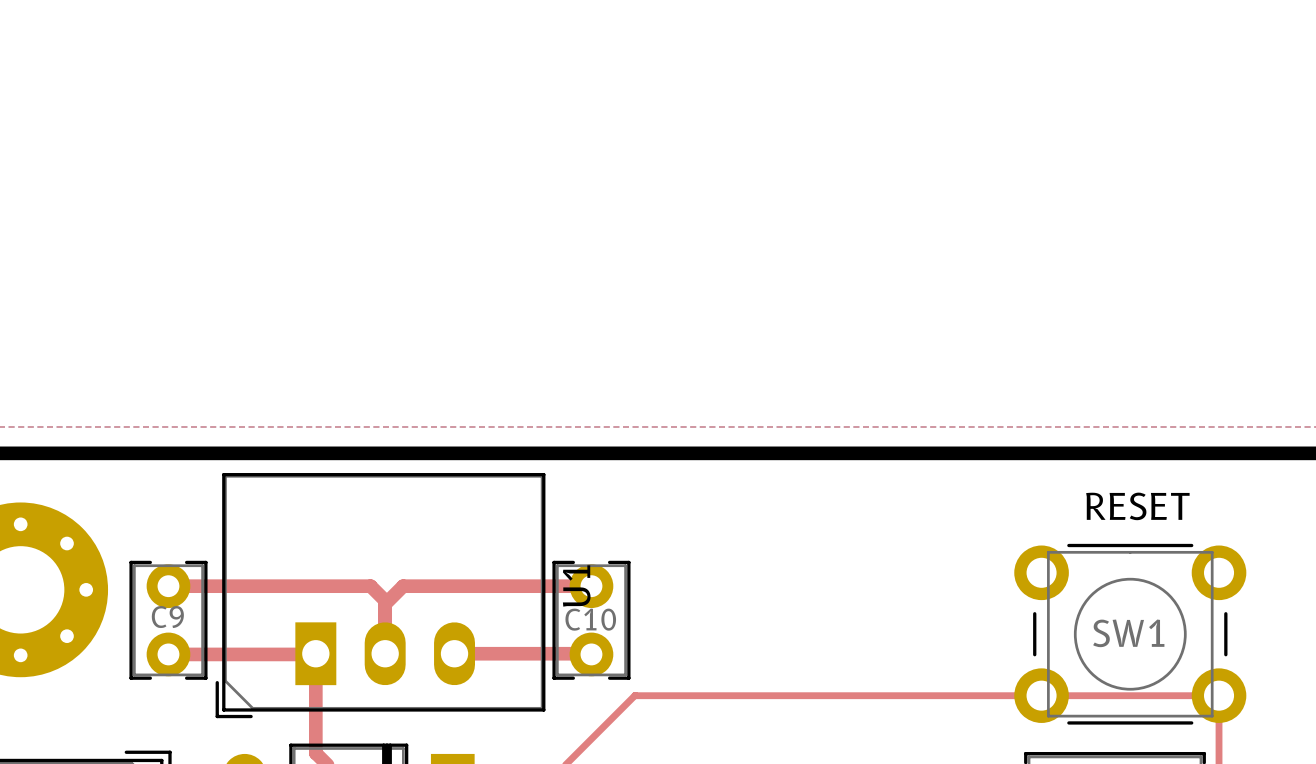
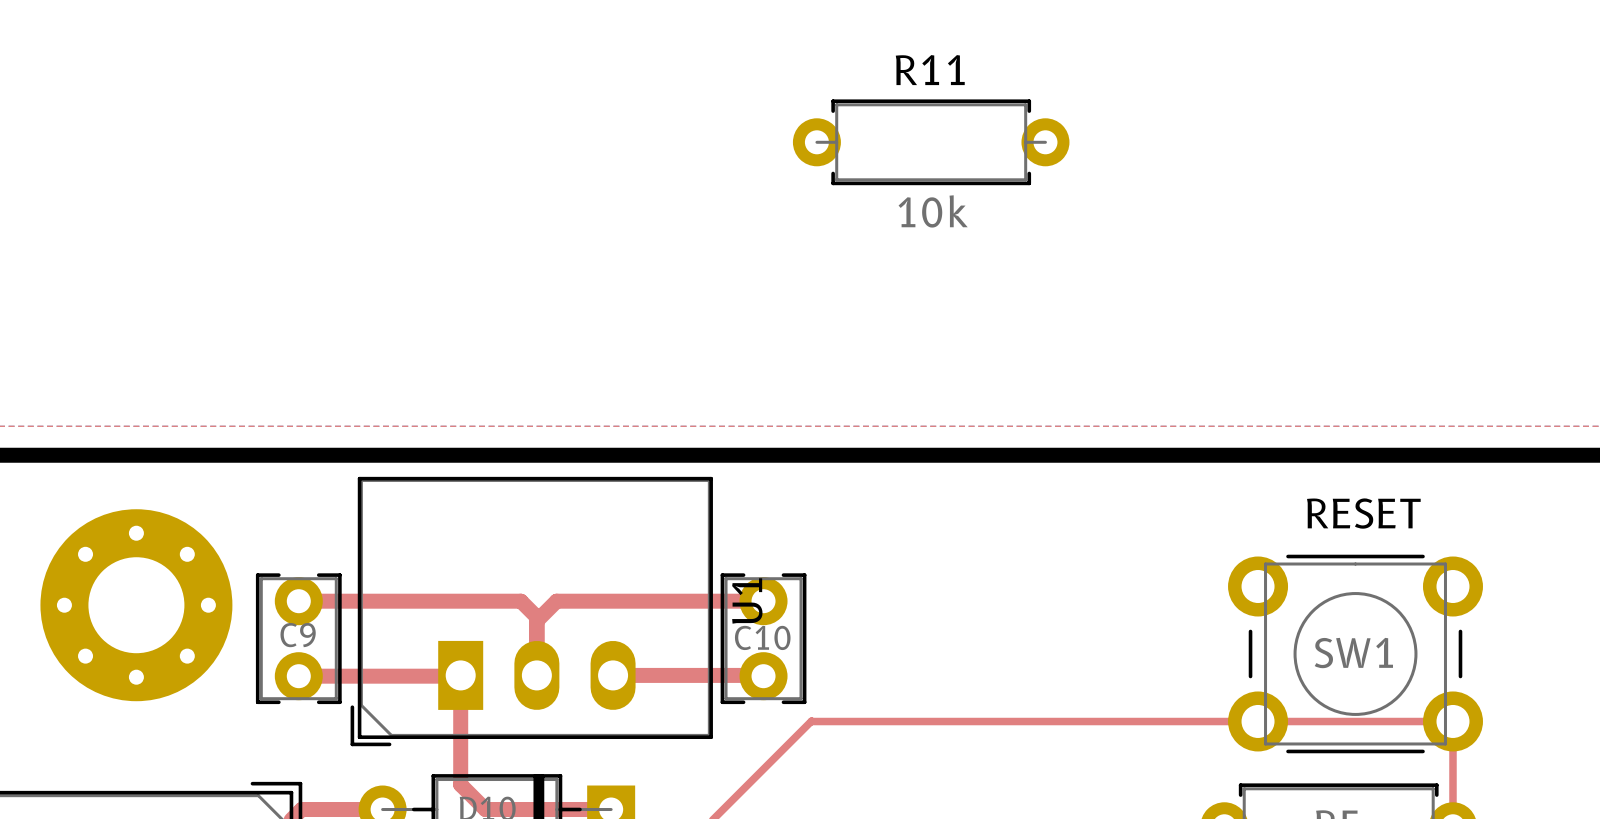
R11: none -> 10k (931, 142)

